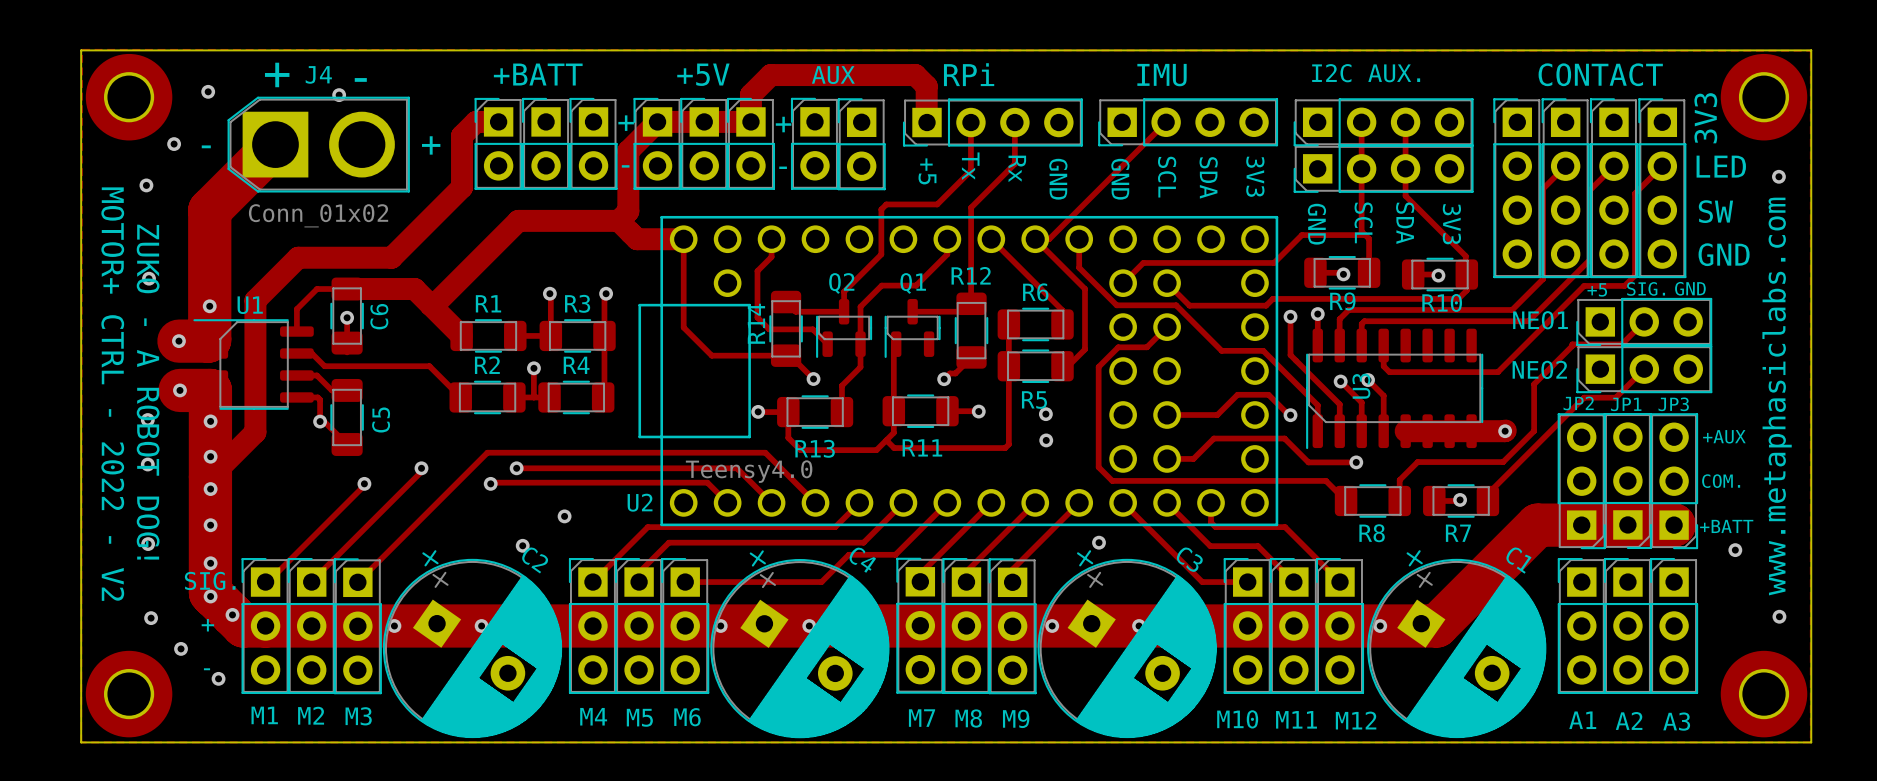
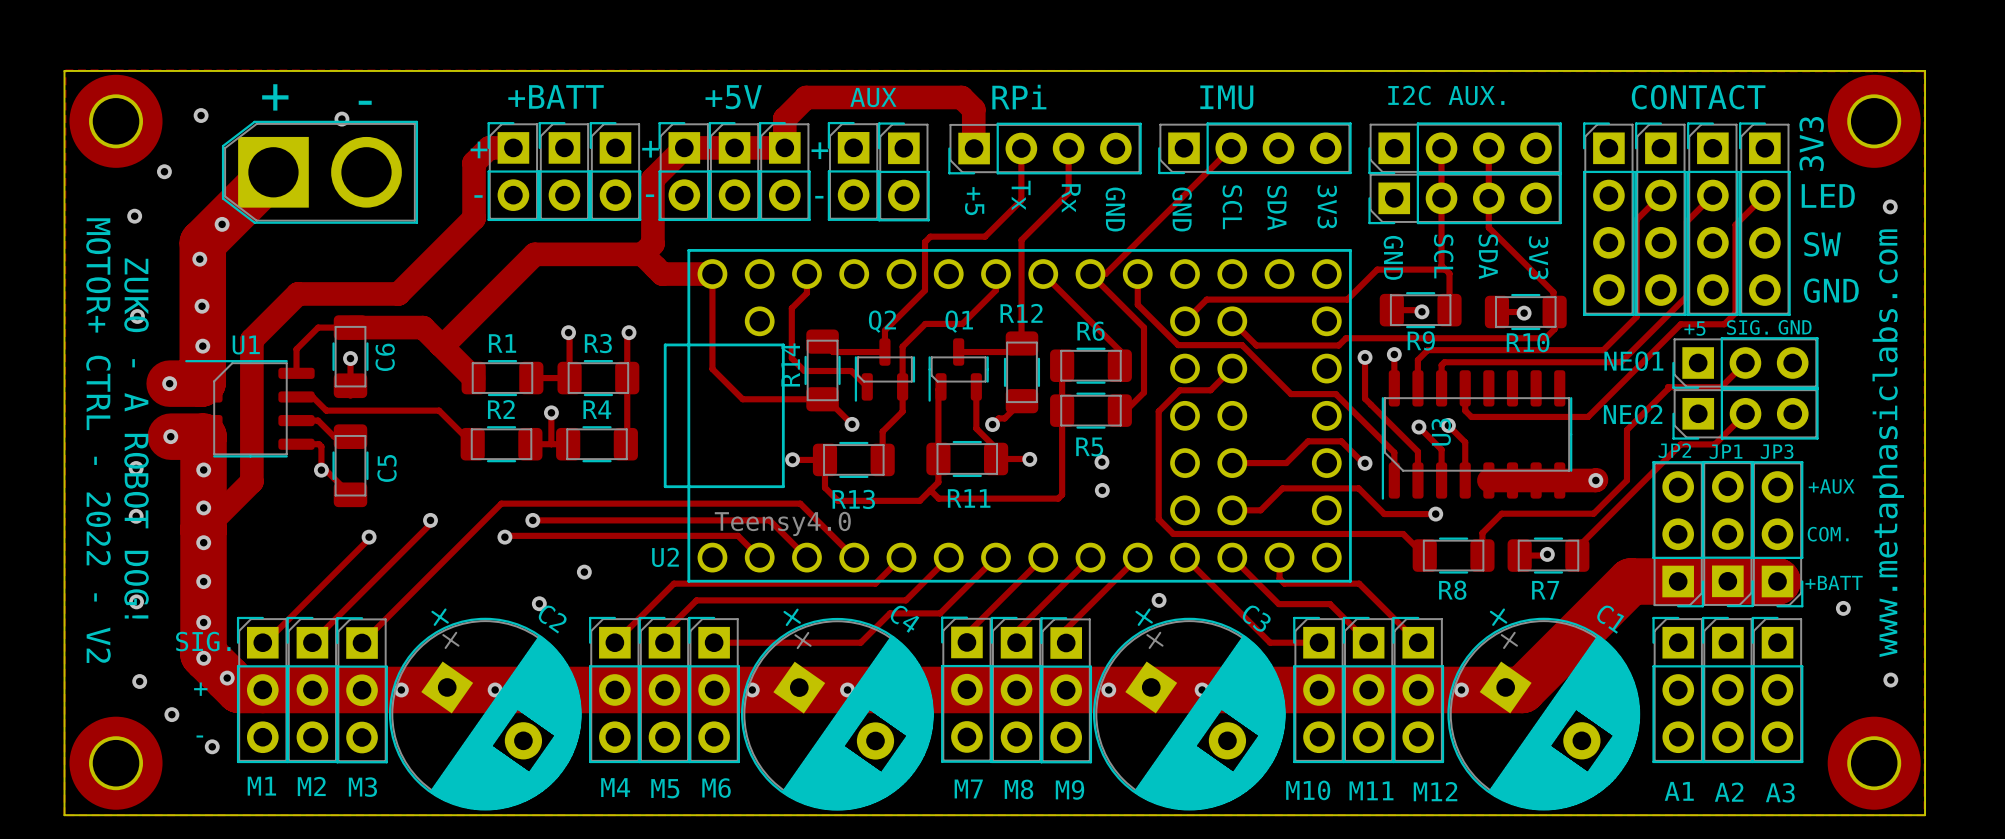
J4 name: J4 (318, 74) -> none
text: none -> + (479, 149)
J4 text: + (431, 145) -> none
J4 text: - (206, 146) -> none
text: none -> - (478, 196)
via: none -> (222, 224)
J4 value: Conn_01x02 (318, 215) -> none
via: none -> (199, 259)
via: none -> (202, 306)
track: none -> (976, 386) (976, 428) (996, 448) (996, 458)

